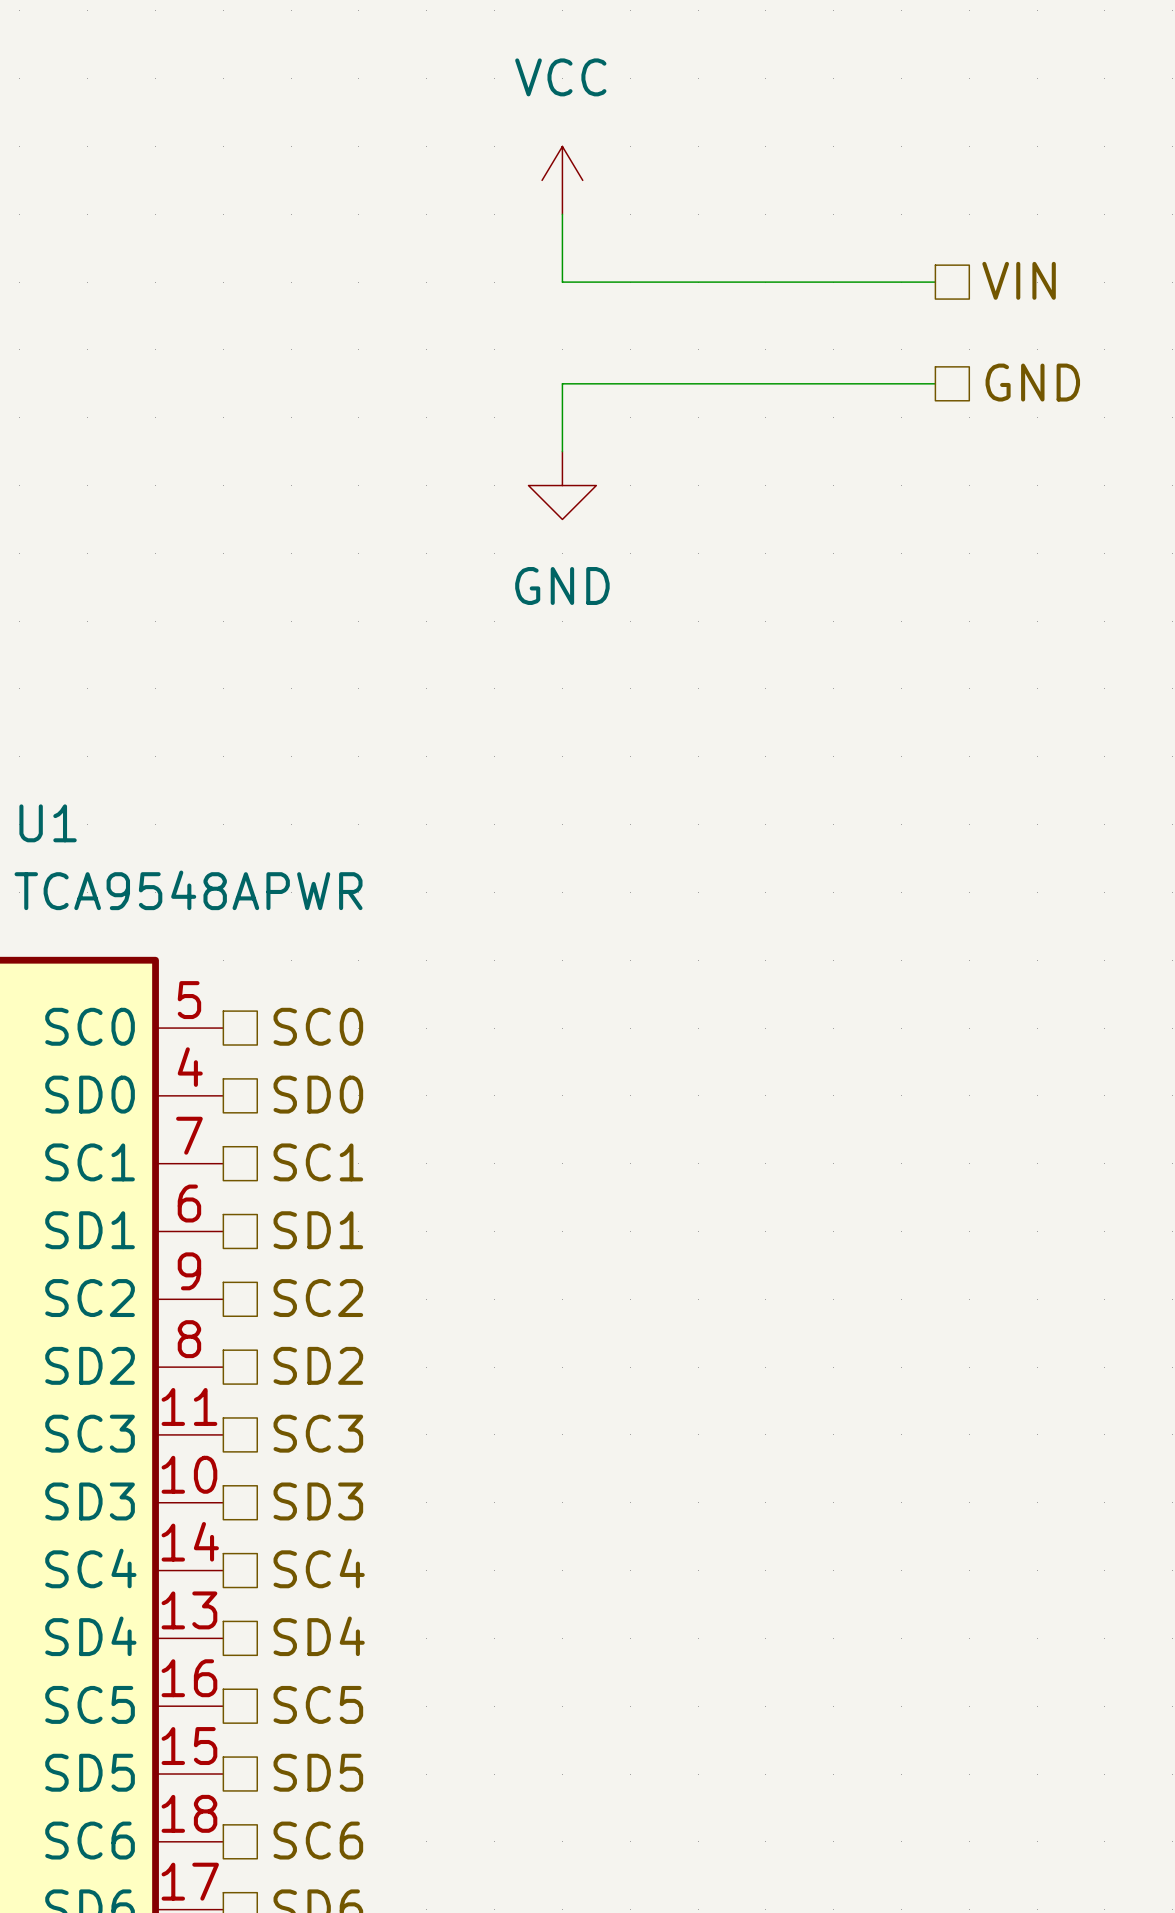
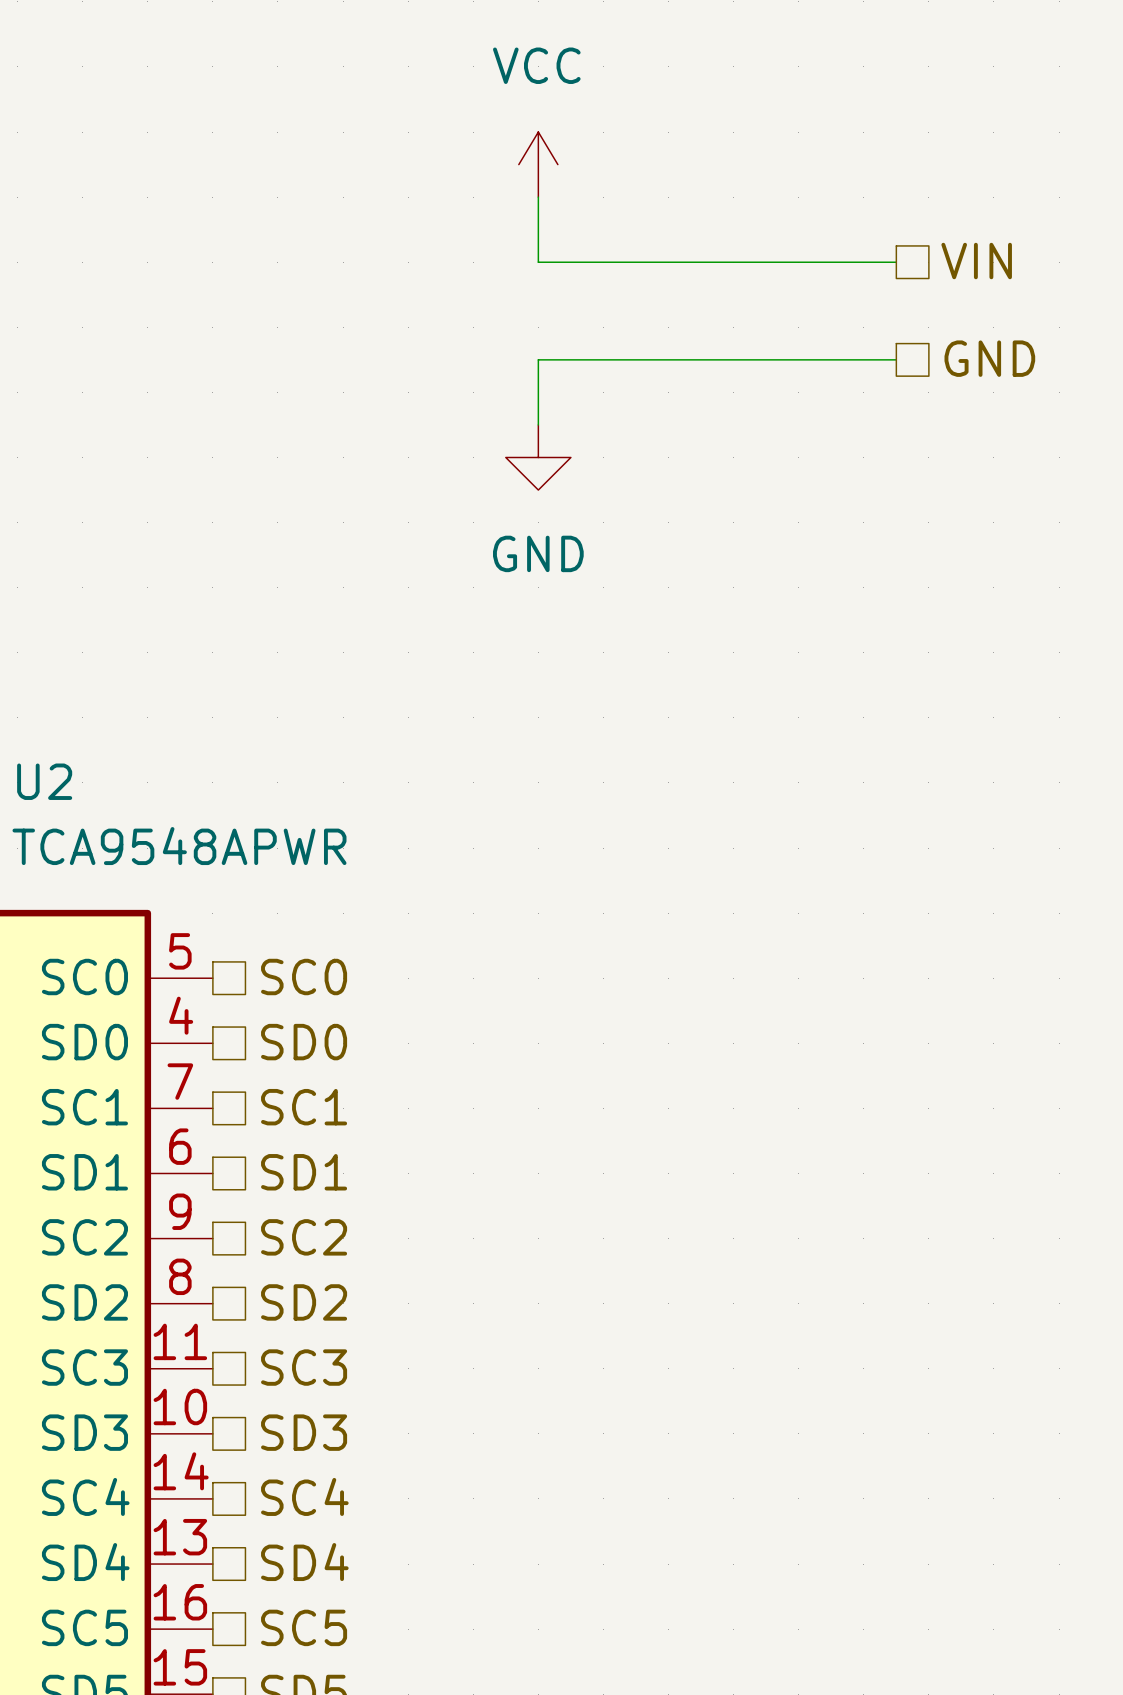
U1 name: U1 (48, 823) -> U2 (44, 781)

